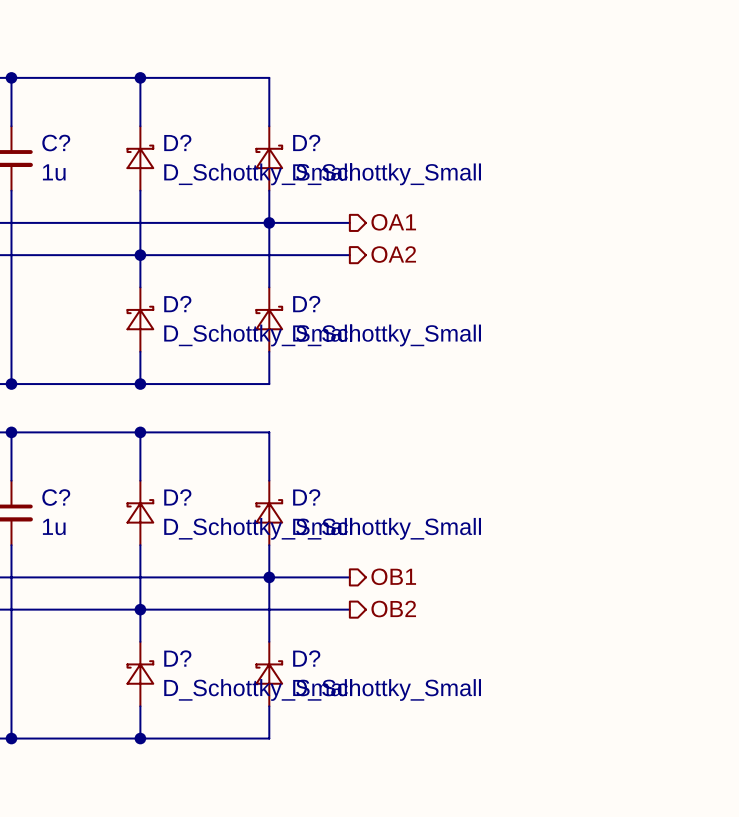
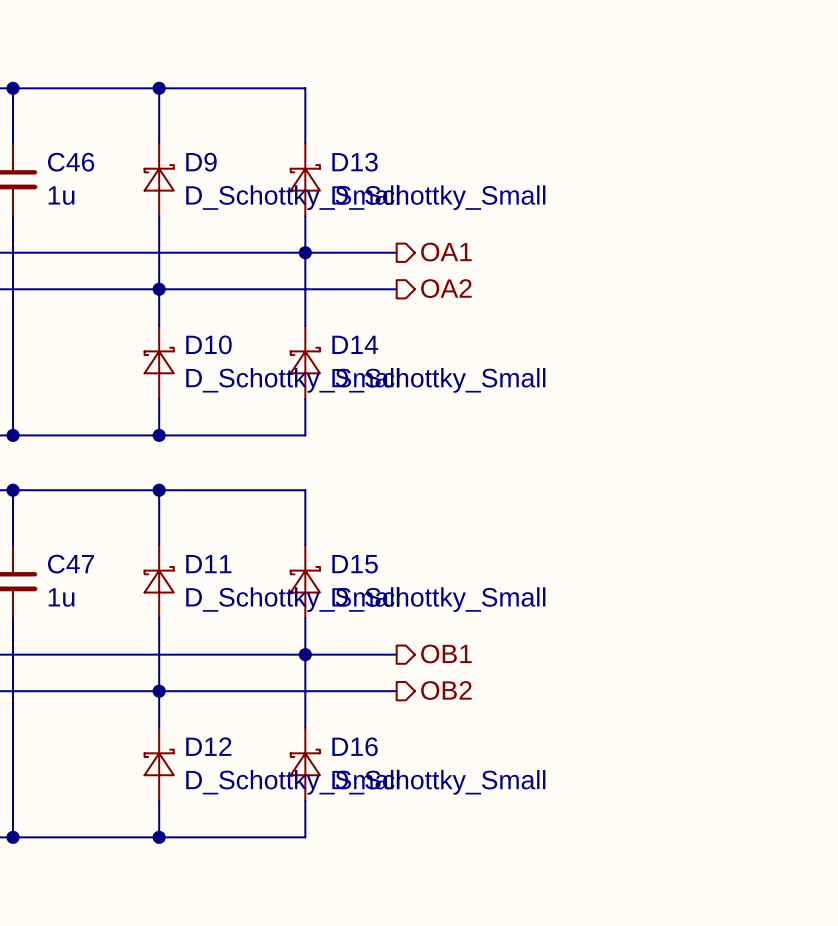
D? name: D? (177, 142) -> D9 (201, 162)
D? name: D? (306, 142) -> D13 (355, 162)
C? name: C? (56, 143) -> C46 (71, 162)
D? name: D? (177, 304) -> D10 (208, 344)
D? name: D? (306, 304) -> D14 (355, 344)
C? name: C? (56, 497) -> C47 (71, 564)
D? name: D? (177, 497) -> D11 (208, 564)
D? name: D? (306, 497) -> D15 (355, 564)
D? name: D? (177, 658) -> D12 (208, 746)
D? name: D? (306, 658) -> D16 (355, 746)

